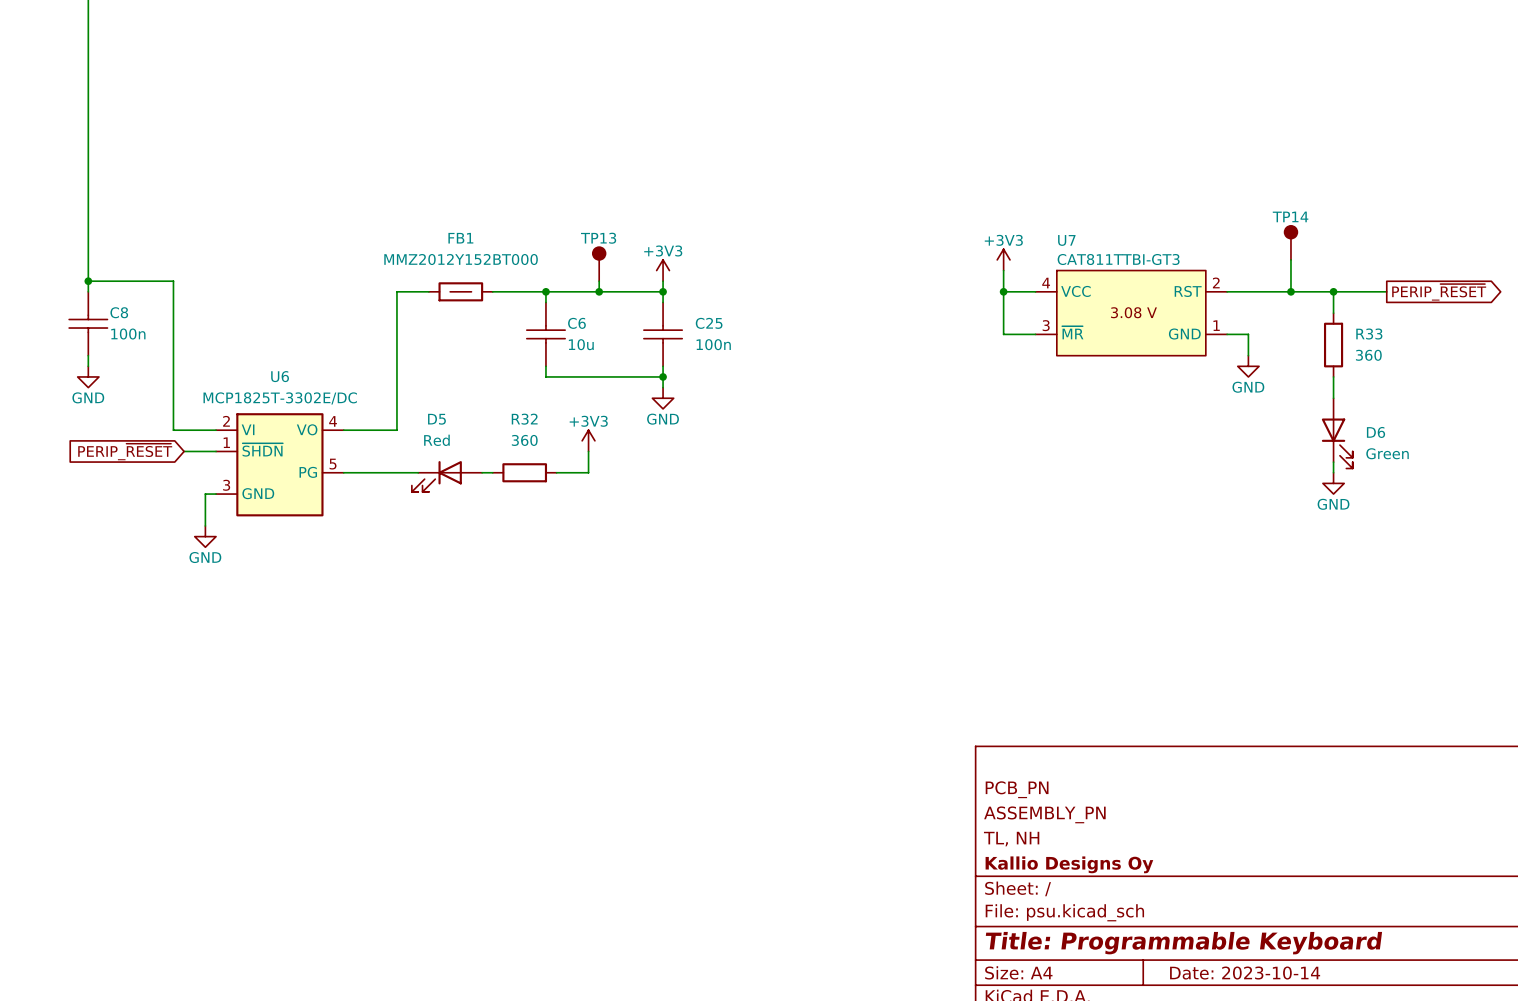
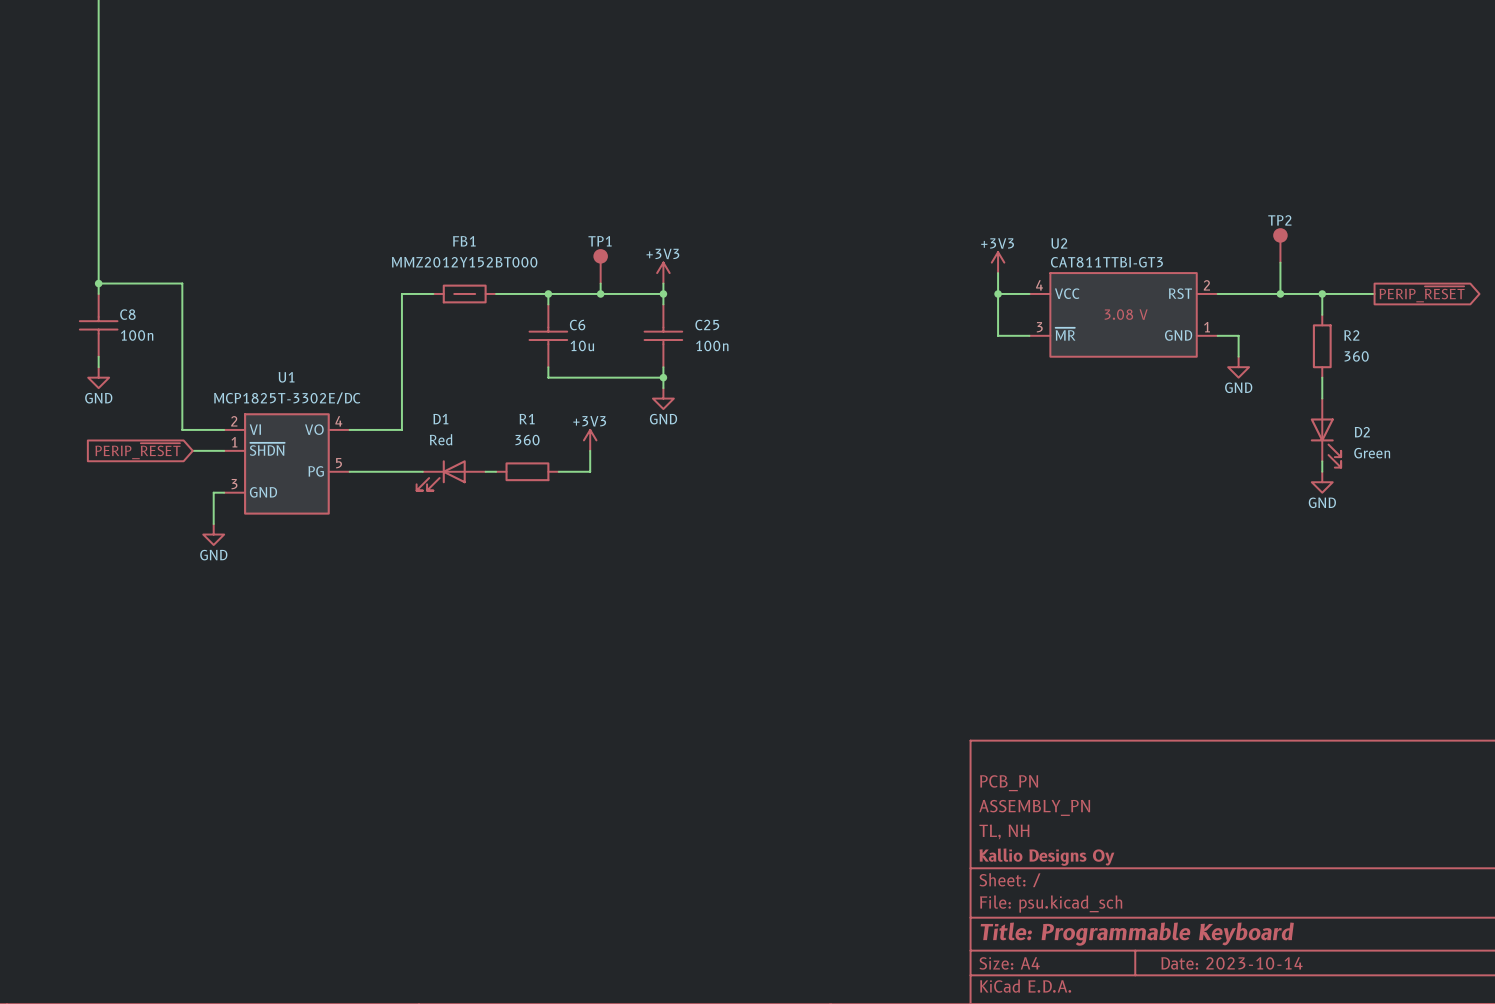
TP14 name: TP14 (1290, 216) -> TP2 (1279, 220)
TP13 name: TP13 (598, 238) -> TP1 (600, 241)
U7 name: U7 (1066, 240) -> U2 (1059, 243)
R33 name: R33 (1369, 334) -> R2 (1351, 335)
U6 name: U6 (280, 376) -> U1 (286, 377)
D5 name: D5 (436, 419) -> D1 (440, 419)
R32 name: R32 (524, 419) -> R1 (527, 419)
D6 name: D6 (1376, 432) -> D2 (1362, 432)

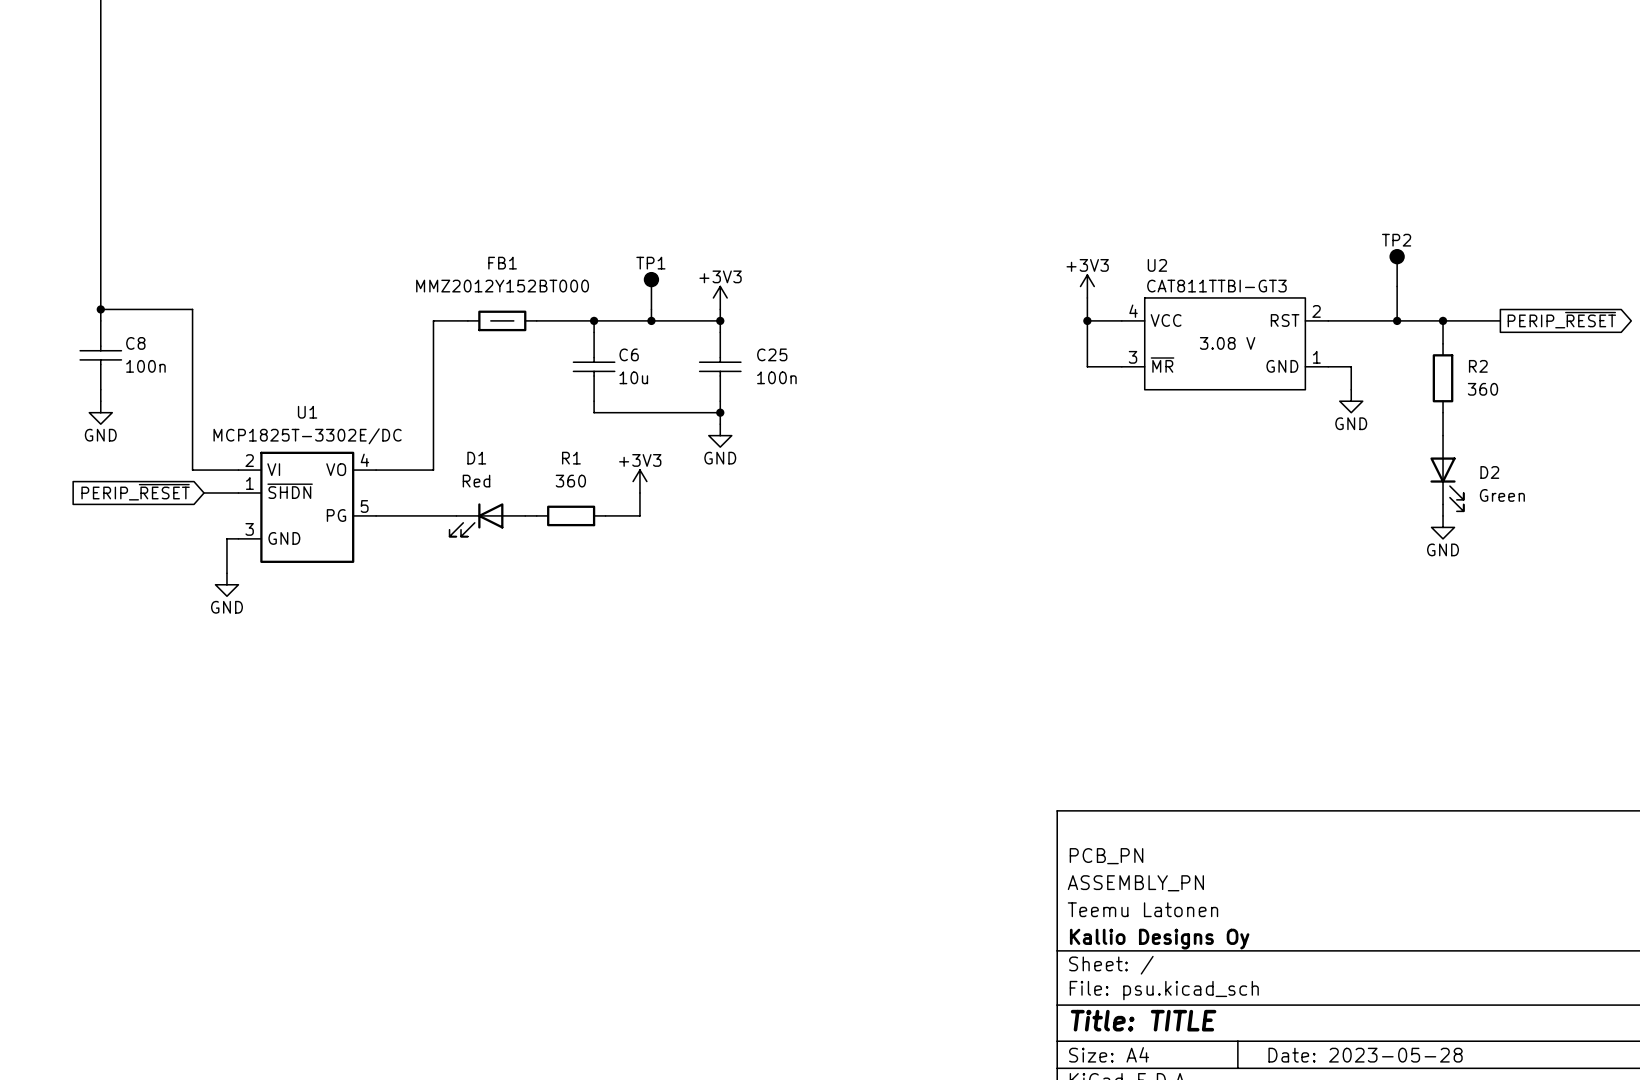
title block: TL, NH (1004, 831) -> Teemu Latonen (1142, 909)
title block: Title: Programmable Keyboard (1137, 934) -> Title: TITLE (1143, 1020)
title block: Date: 2023-10-14 (1231, 963) -> Date: 2023-05-28 (1365, 1055)

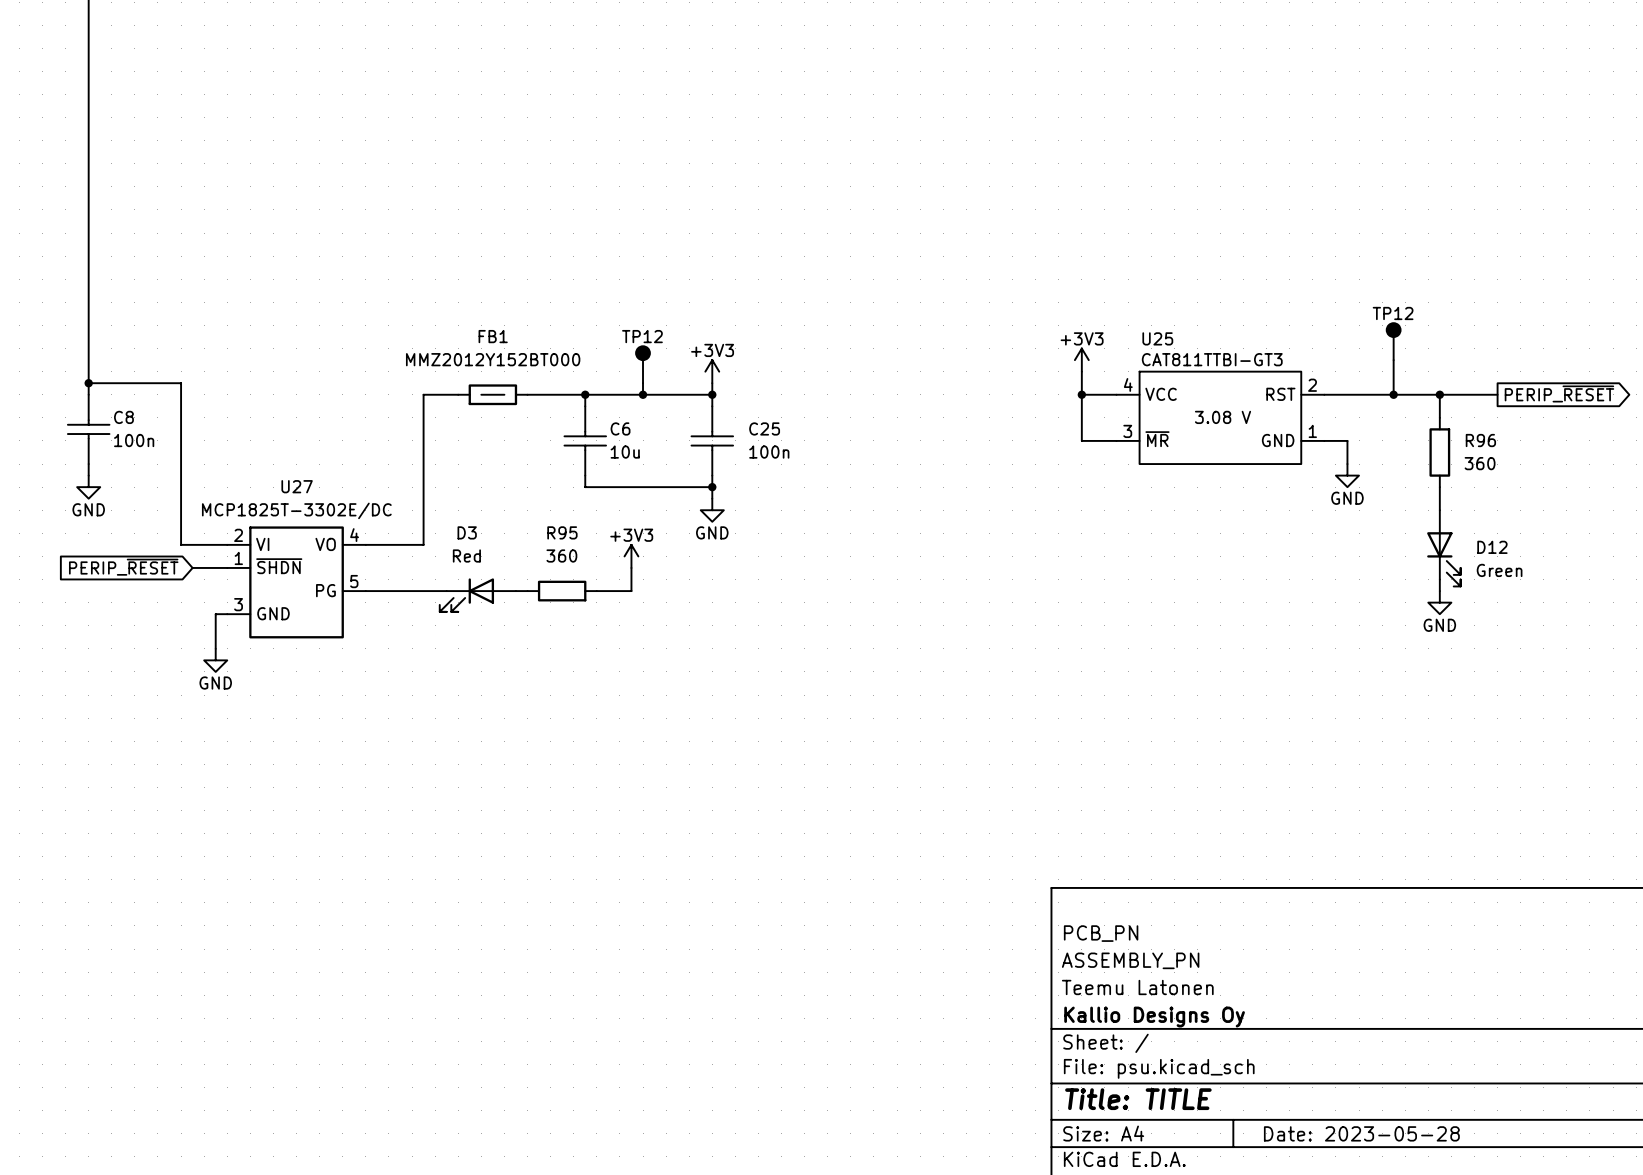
TP2 name: TP2 (1396, 240) -> TP12 (1393, 313)
TP1 name: TP1 (650, 263) -> TP12 (642, 336)
U2 name: U2 (1157, 265) -> U25 (1157, 338)
R2 name: R2 (1478, 366) -> R96 (1480, 440)
U1 name: U1 (307, 412) -> U27 (297, 486)
D1 name: D1 (476, 458) -> D3 (467, 532)
R1 name: R1 (571, 458) -> R95 (562, 532)
D2 name: D2 (1489, 472) -> D12 (1492, 547)

